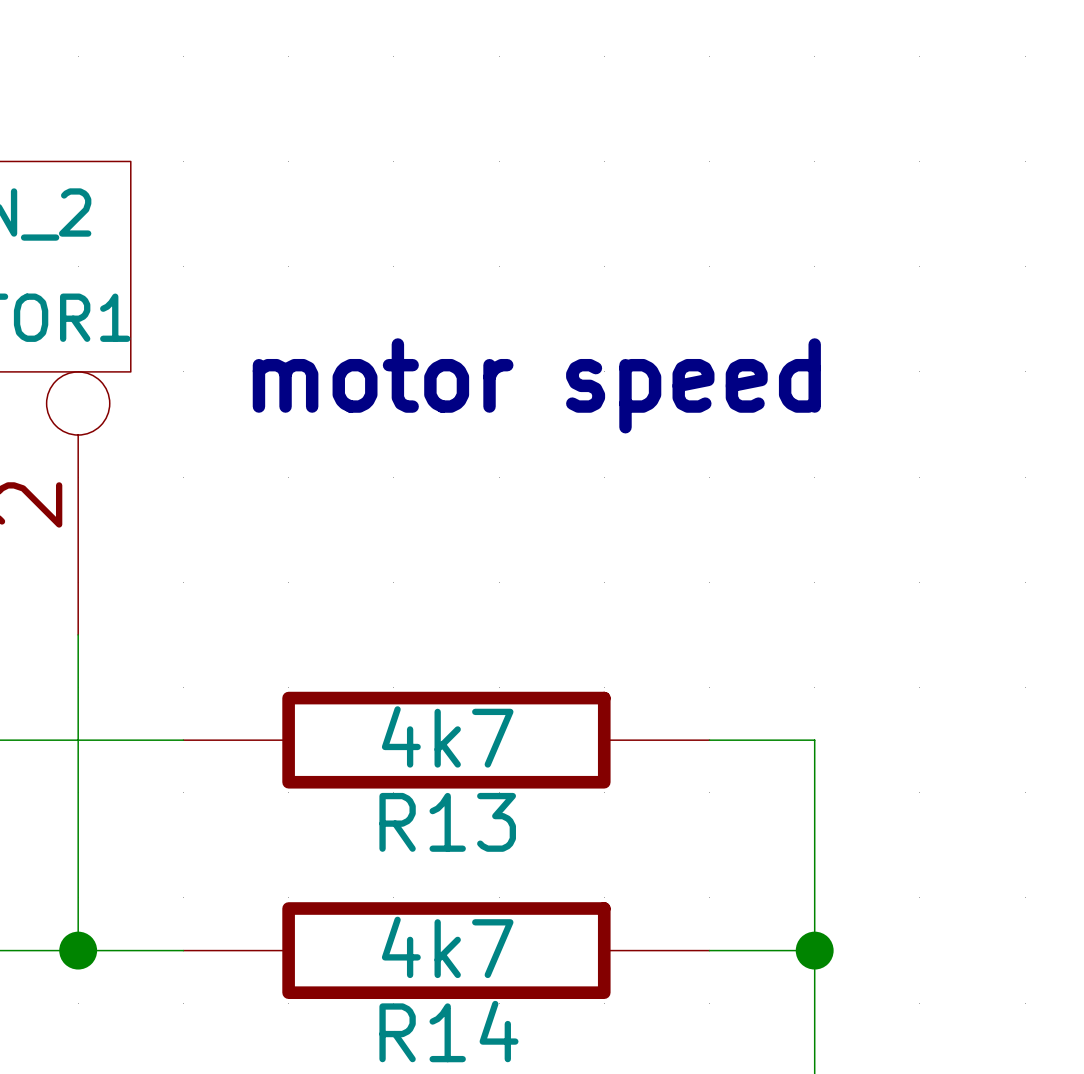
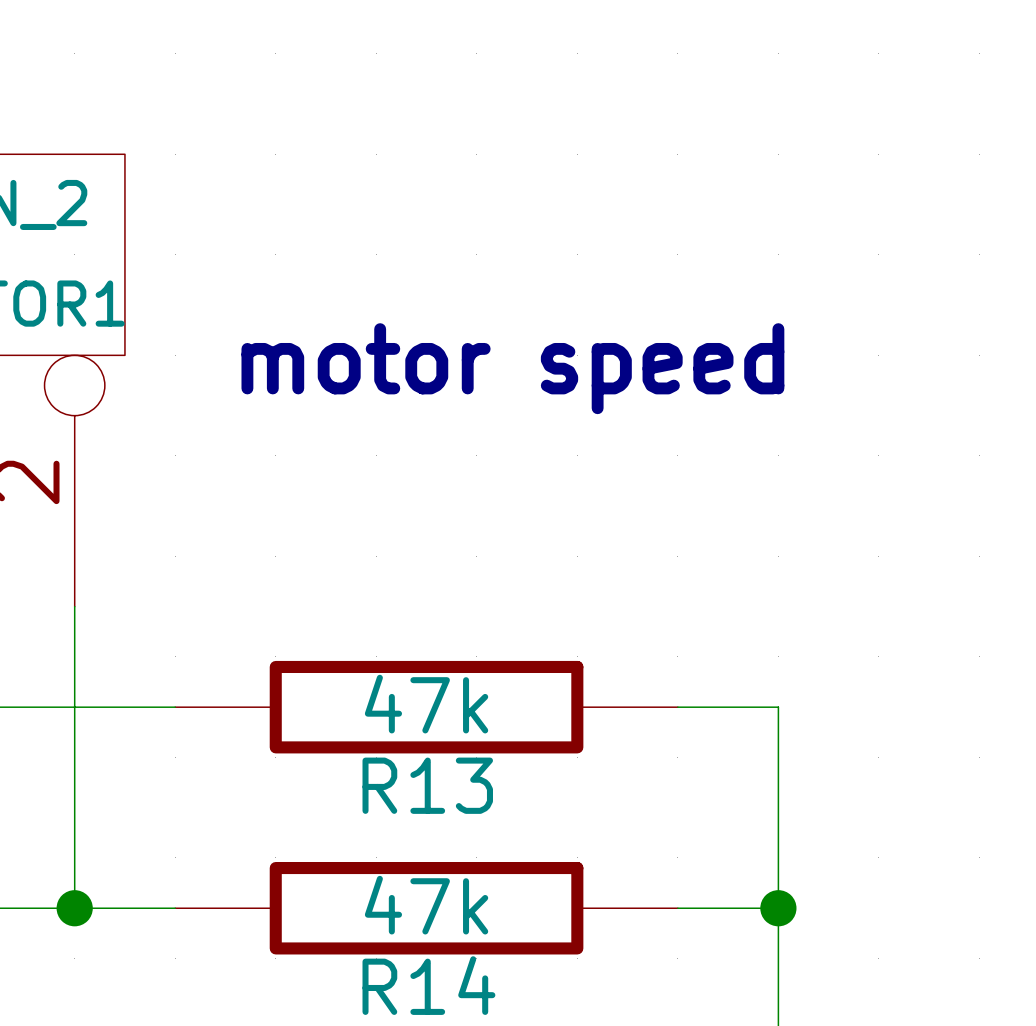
R13 value: 4k7 (447, 736) -> 47k (426, 704)
R14 value: 4k7 (447, 947) -> 47k (426, 905)

